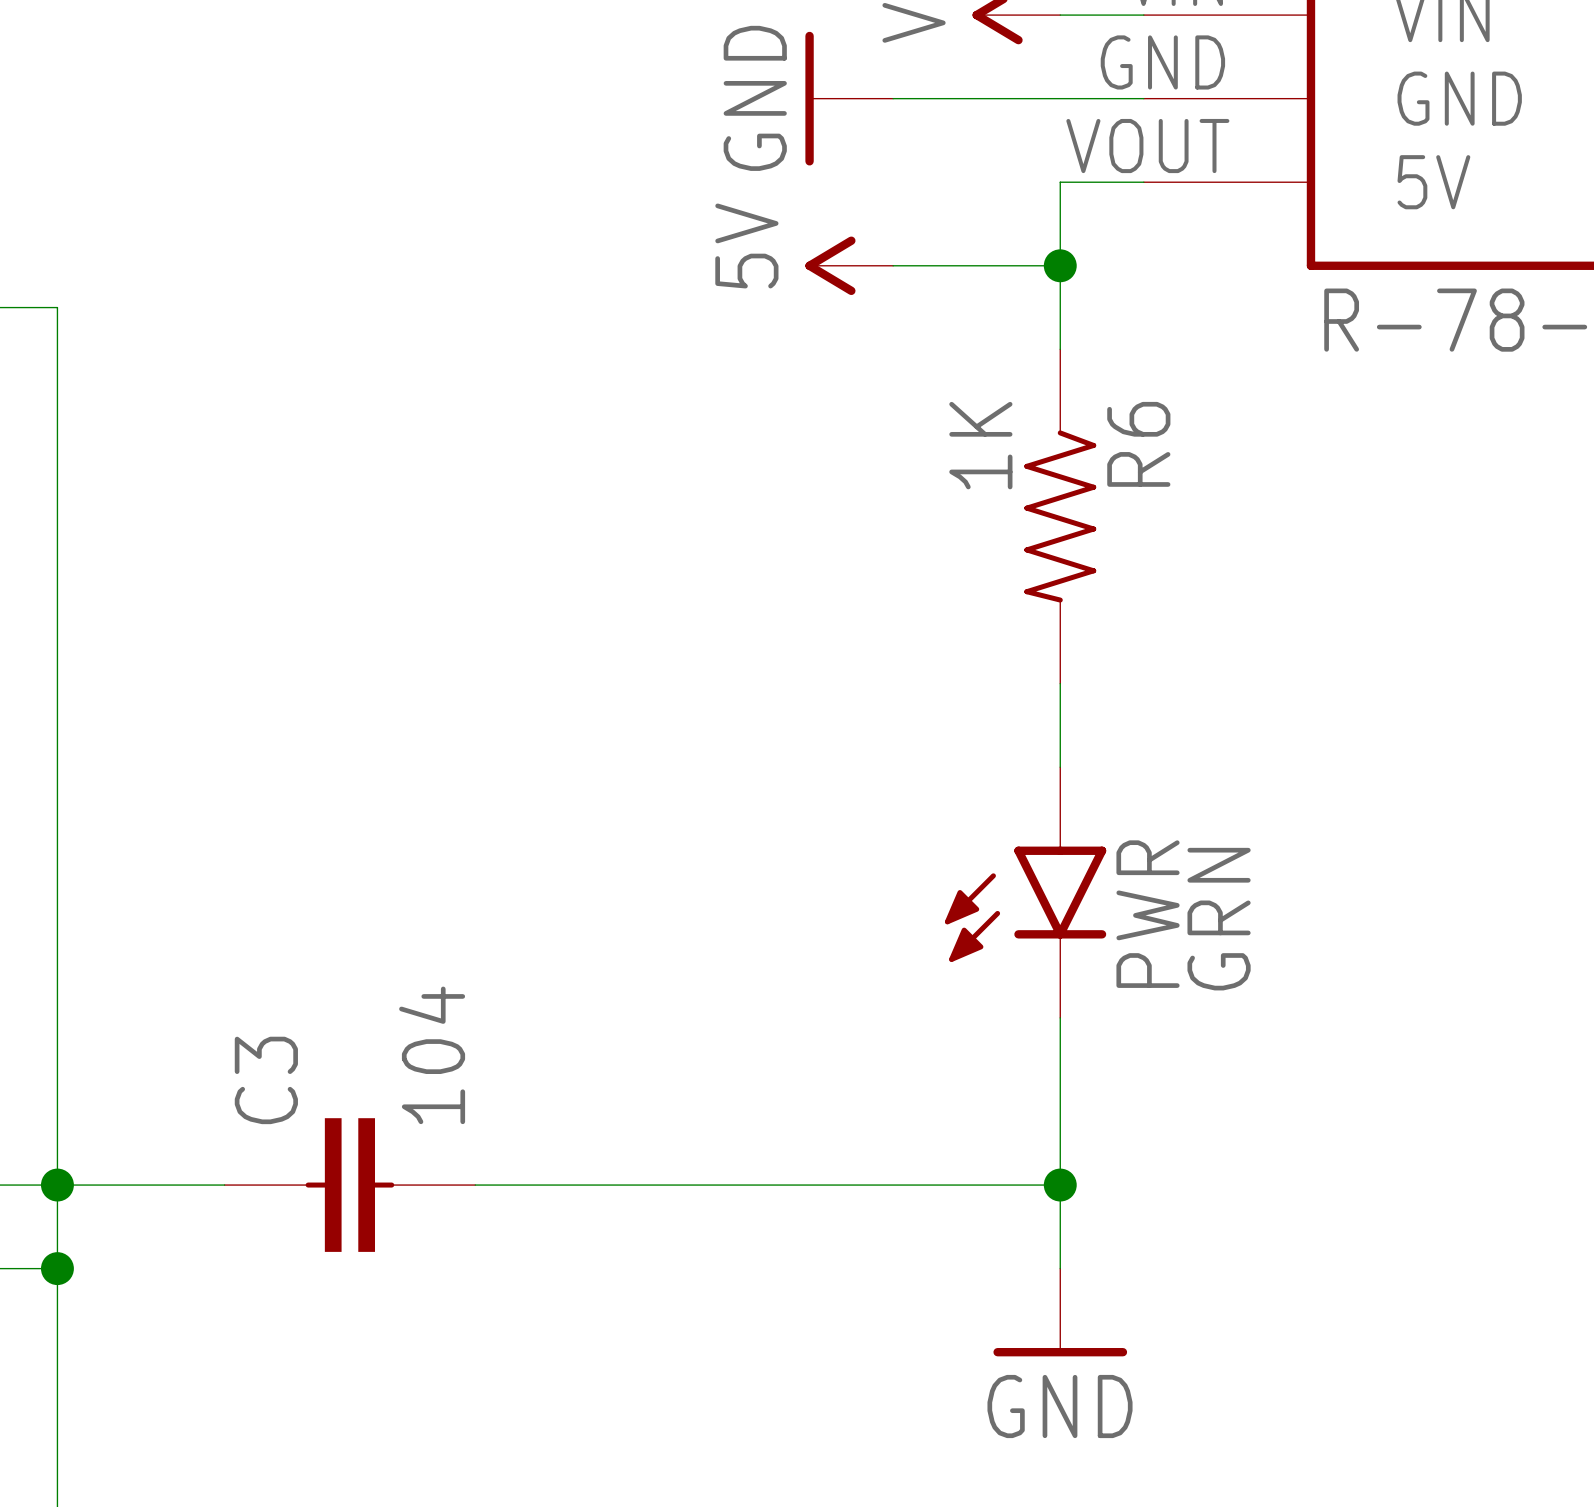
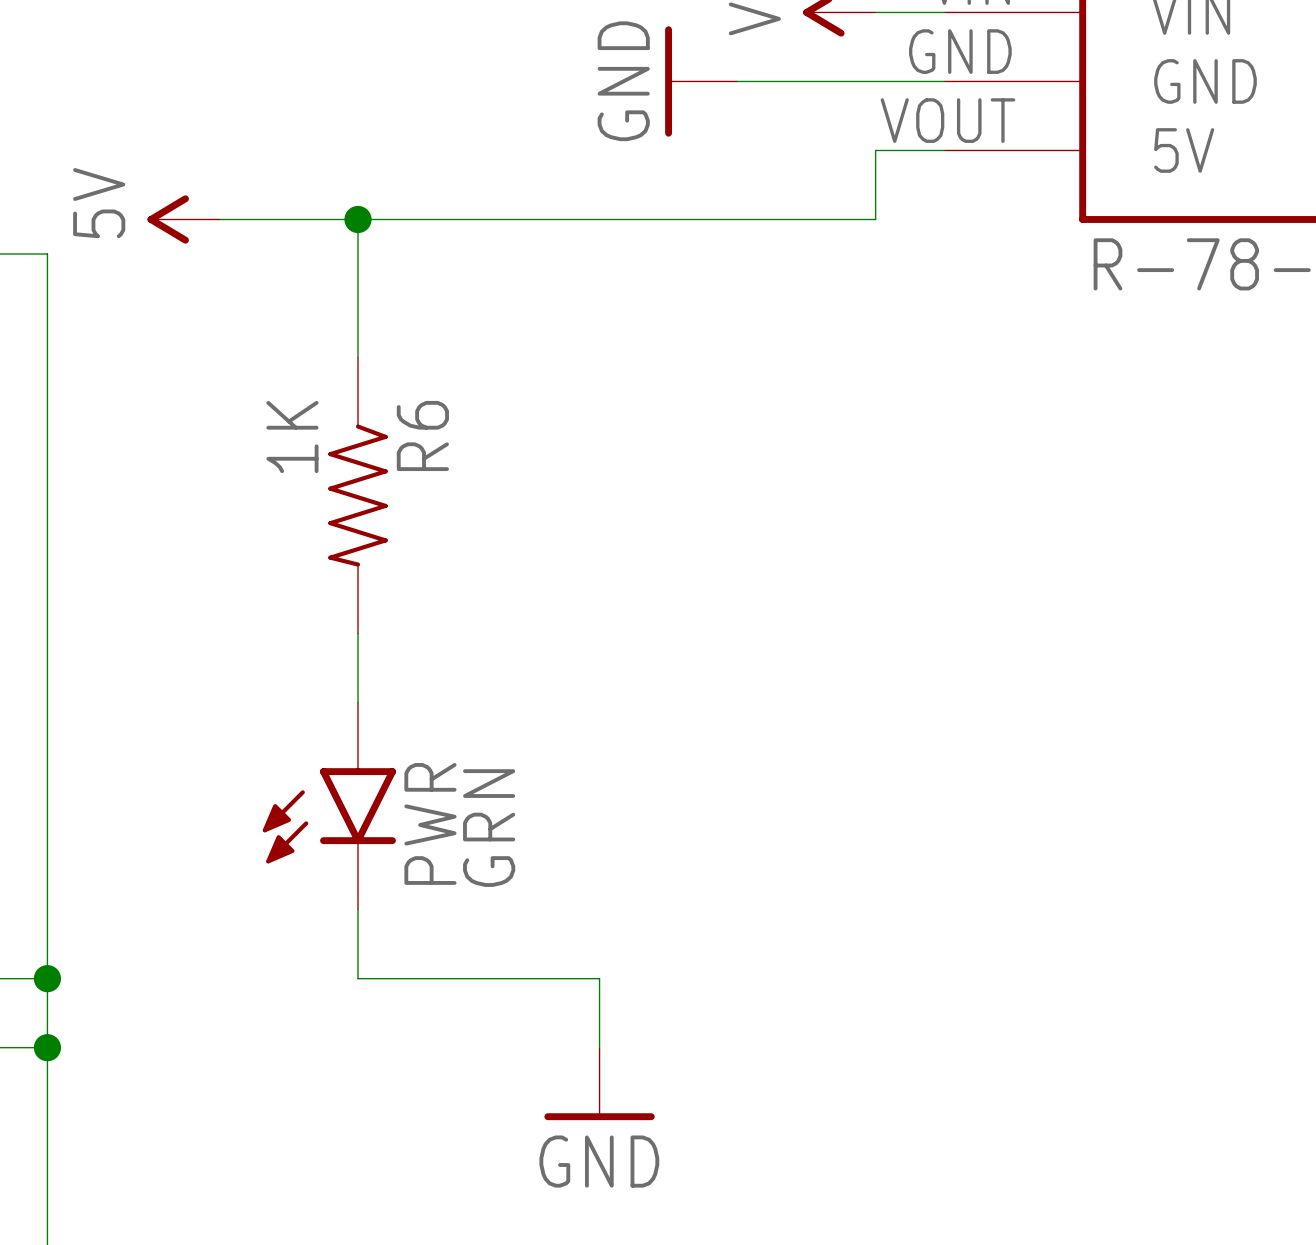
wire: none -> (219, 219) (737, 219)
wire: none -> (358, 219) (358, 357)
junction: none -> (358, 219)
power symbol position: 5V (849, 265) -> 5V (183, 219)
wire: (1060, 265) (1060, 349) -> none
junction: (1060, 265) -> none
R6 position: (1060, 516) -> (358, 495)
wire: (1060, 683) (1060, 767) -> (358, 633) (358, 702)
PWR position: (1025, 892) -> (329, 806)
wire: (1060, 1017) (1060, 1268) -> none
wire: none -> (358, 909) (358, 978) (392, 978)
wire: (57, 1185) (224, 1185) -> none
C3: 104 (349, 1185) -> none
wire: (725, 1185) (1060, 1185) -> (599, 978) (599, 1047)
junction: (1060, 1185) -> none
power symbol position: GND (1060, 1312) -> GND (599, 1083)

